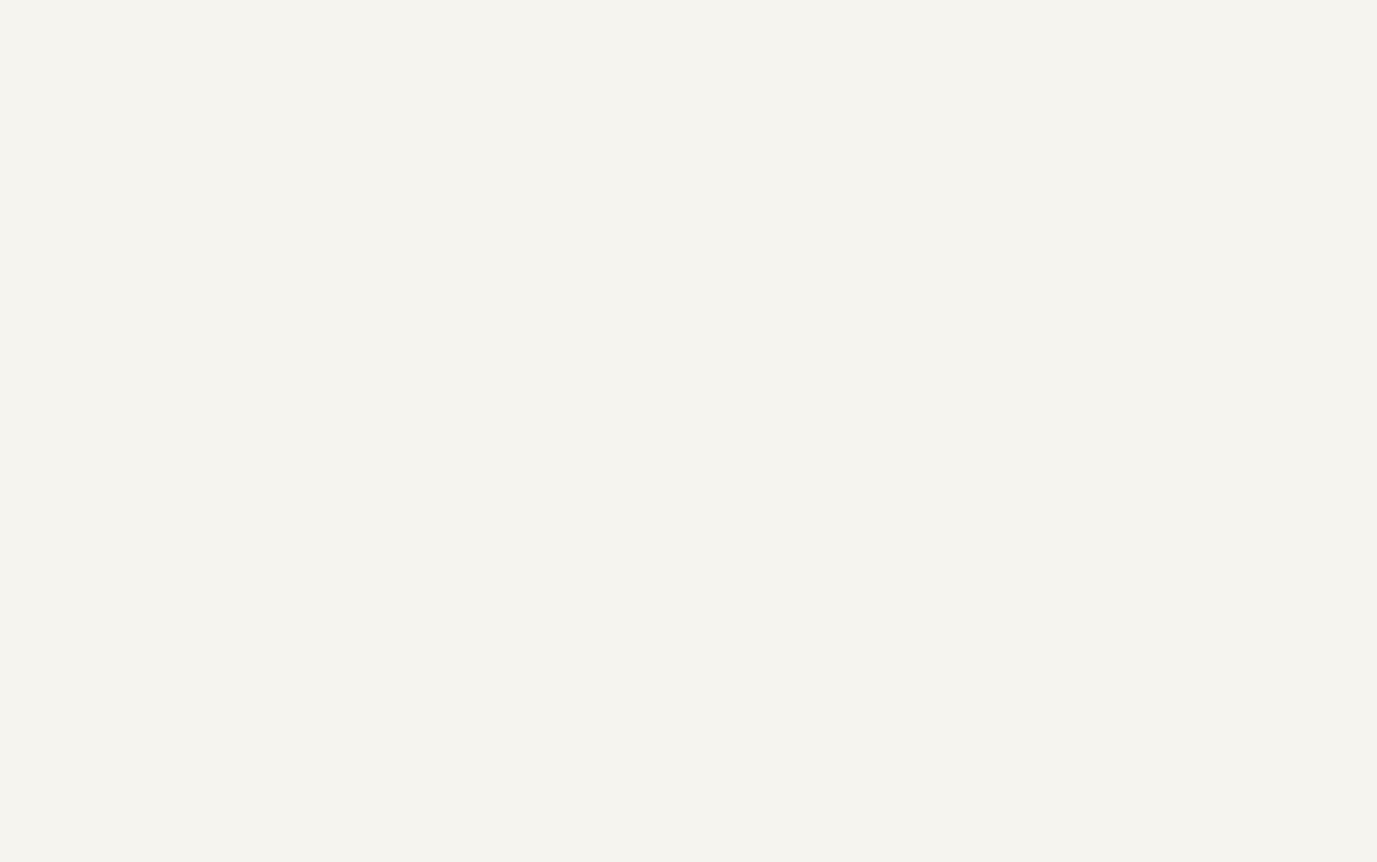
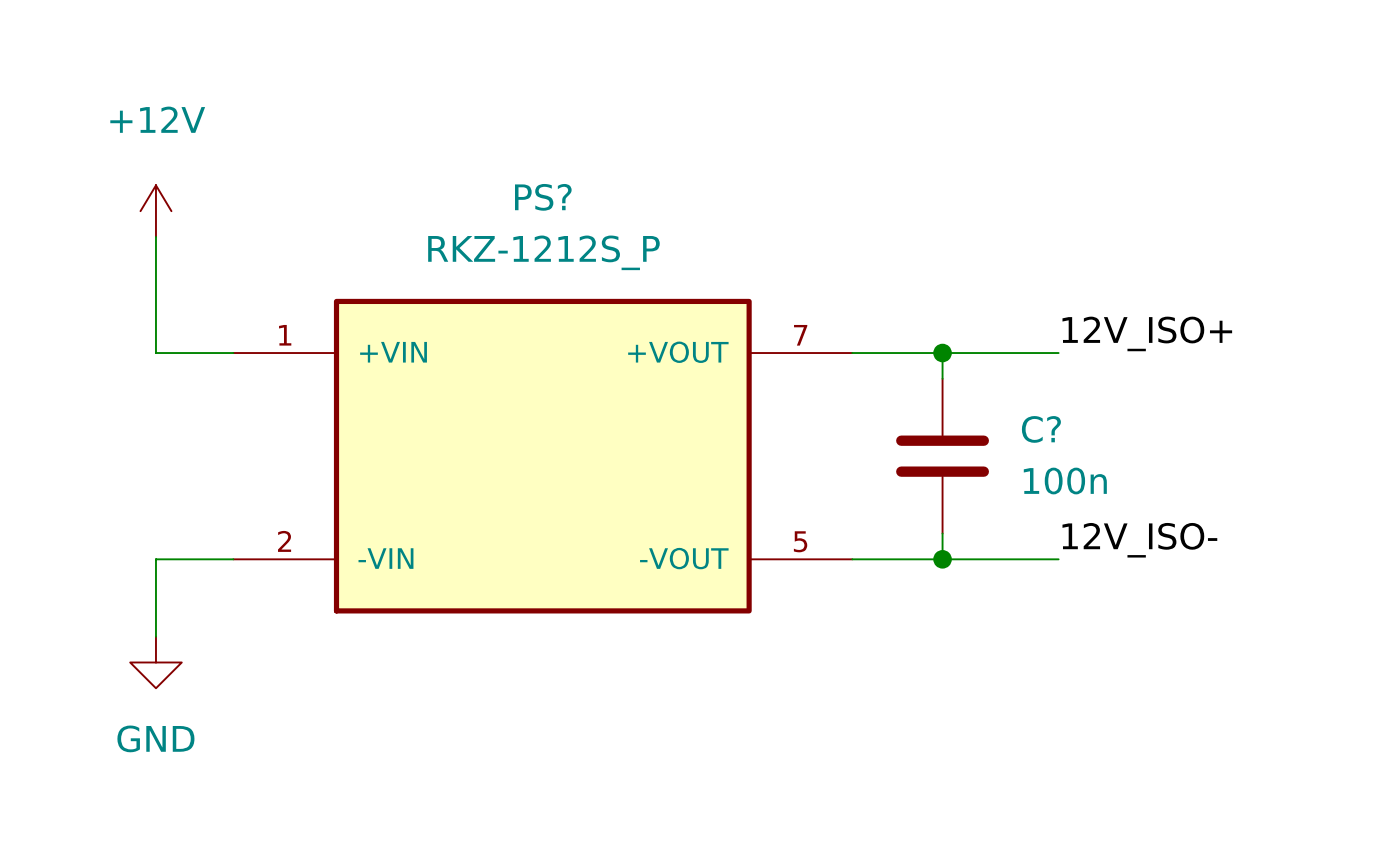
power symbol: none -> +12V (155, 211)
wire: none -> (155, 236) (155, 353) (233, 353)
label: none -> 12V_ISO+ (1147, 333)
wire: none -> (852, 353) (1058, 353)
wire: none -> (942, 353) (942, 378)
junction: none -> (942, 353)
PS?: none -> RKZ-1212S_P (542, 456)
C?: none -> 100n (942, 456)
wire: none -> (942, 533) (942, 559)
label: none -> 12V_ISO- (1139, 540)
wire: none -> (233, 559) (155, 559) (155, 636)
wire: none -> (852, 559) (1058, 559)
junction: none -> (942, 559)
power symbol: none -> GND (155, 662)

